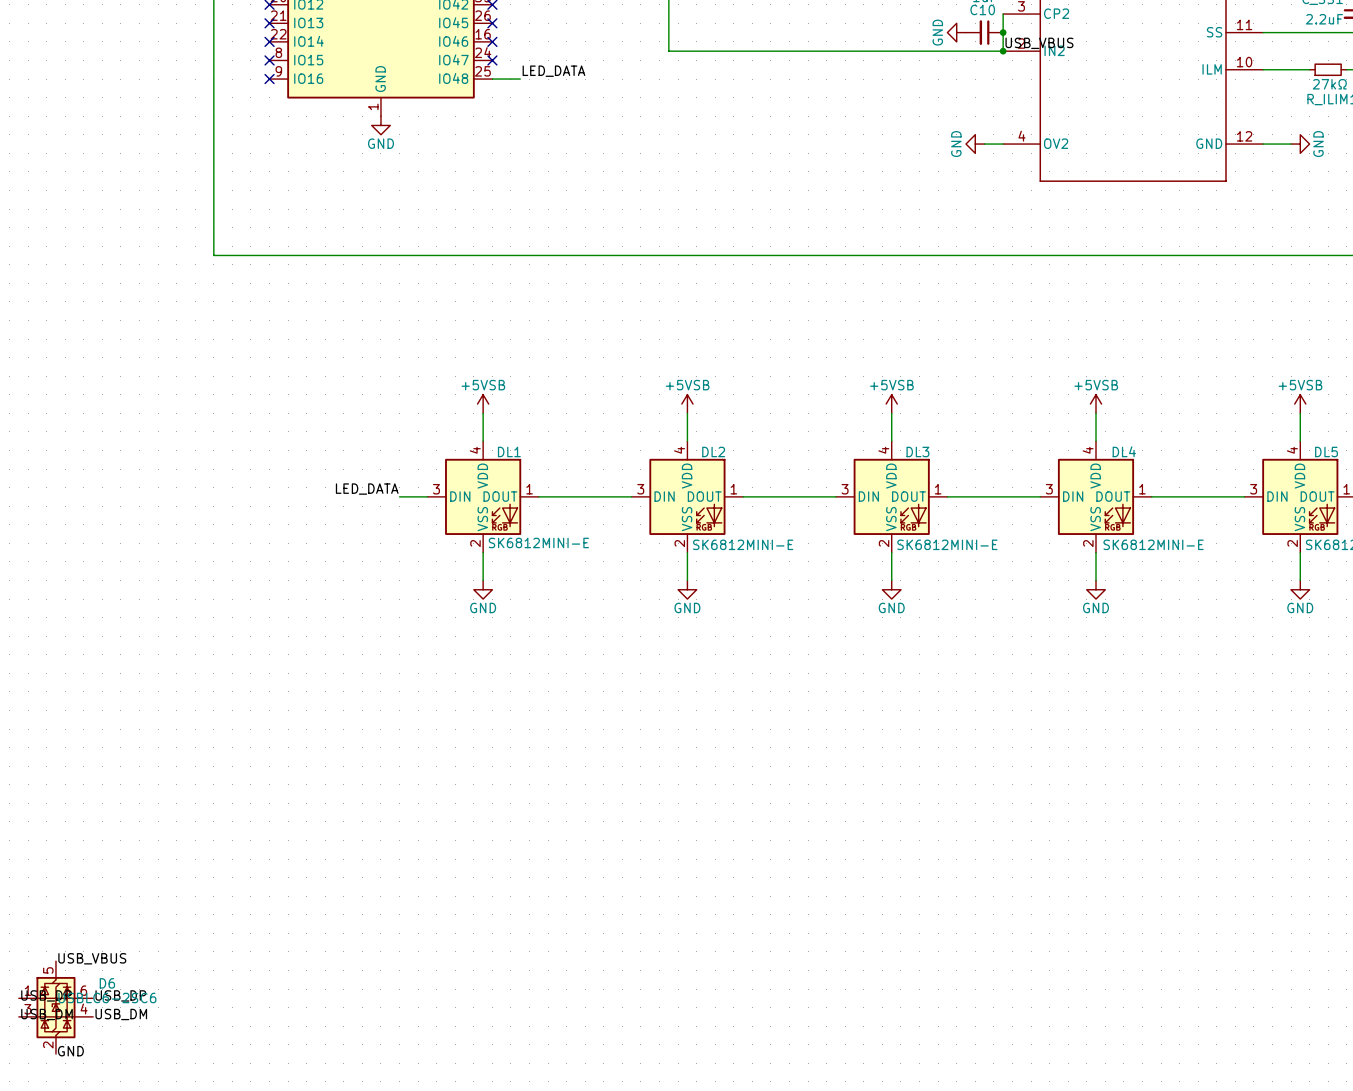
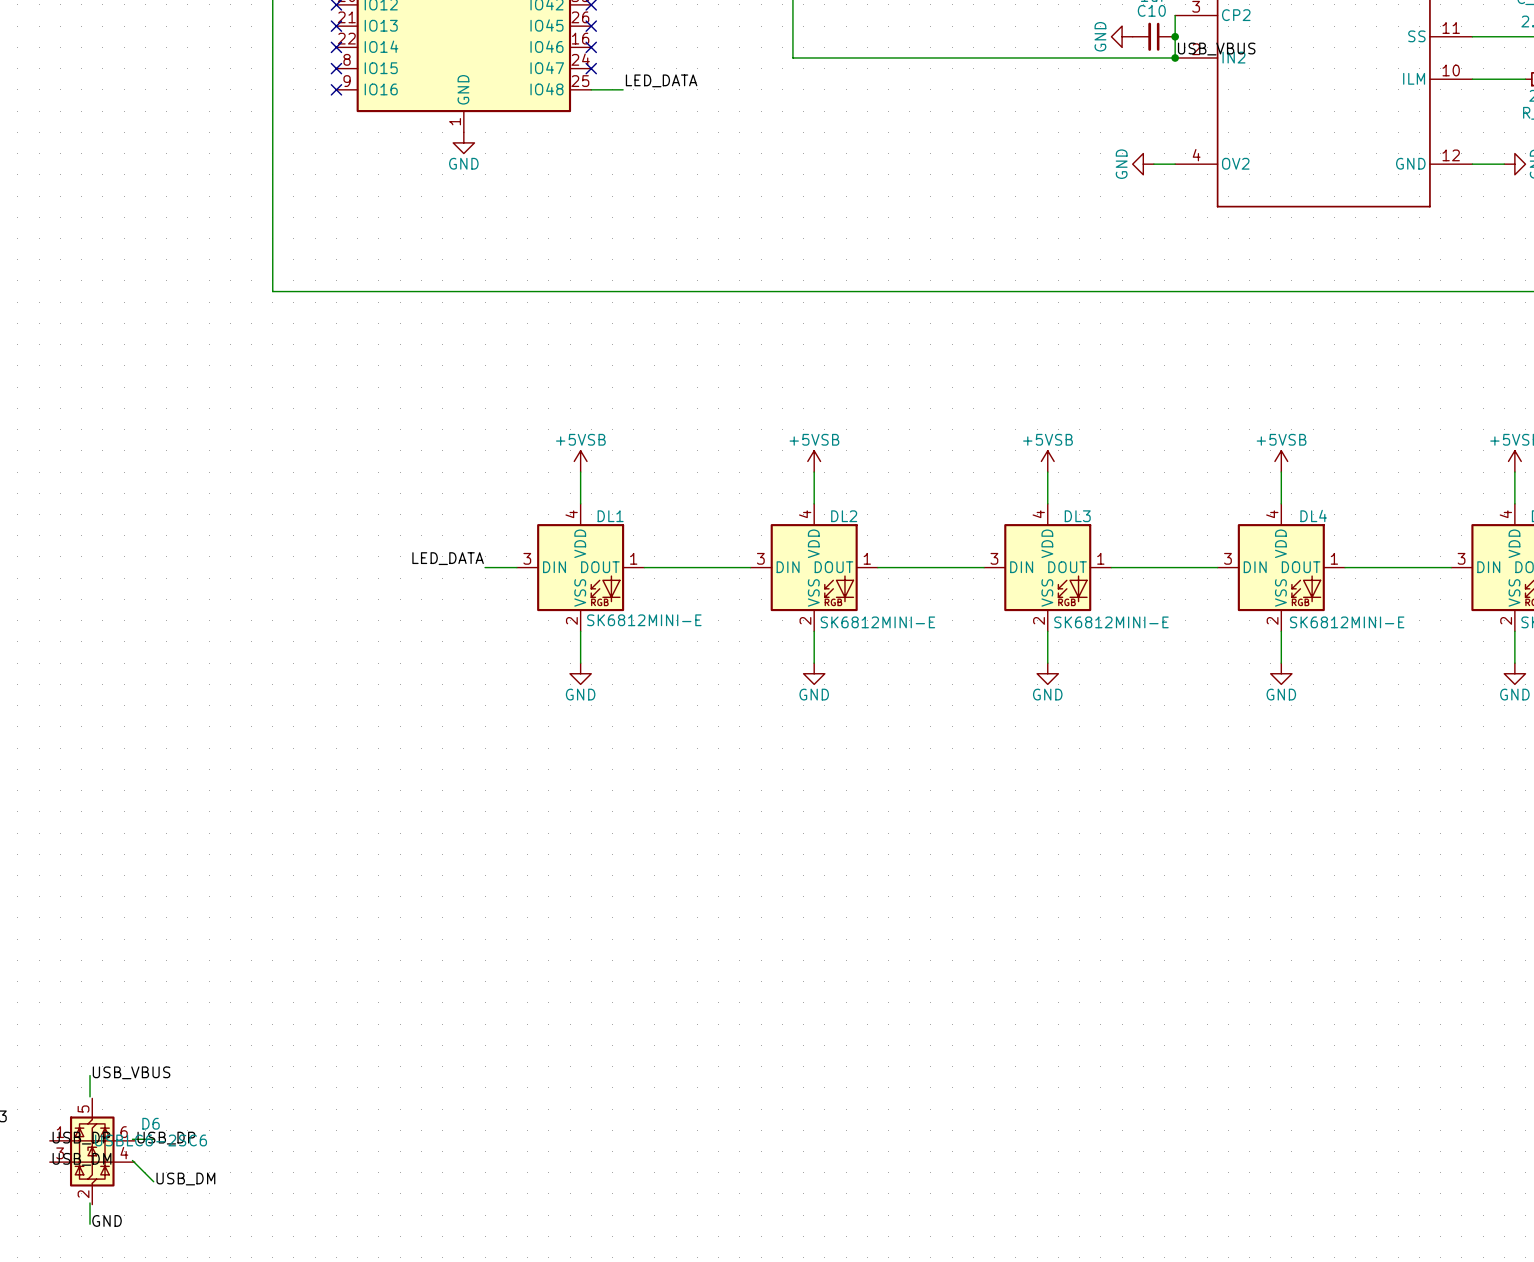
wire: none -> (90, 1075) (90, 1096)
label position: USB_VBUS (92, 958) -> USB_VBUS (131, 1072)
wire: none -> (132, 1139) (153, 1139)
label position: USB_DM (121, 1014) -> USB_DM (185, 1178)
wire: none -> (132, 1160) (153, 1181)
label position: GND (70, 1051) -> GND (107, 1220)
wire: none -> (90, 1202) (90, 1224)

